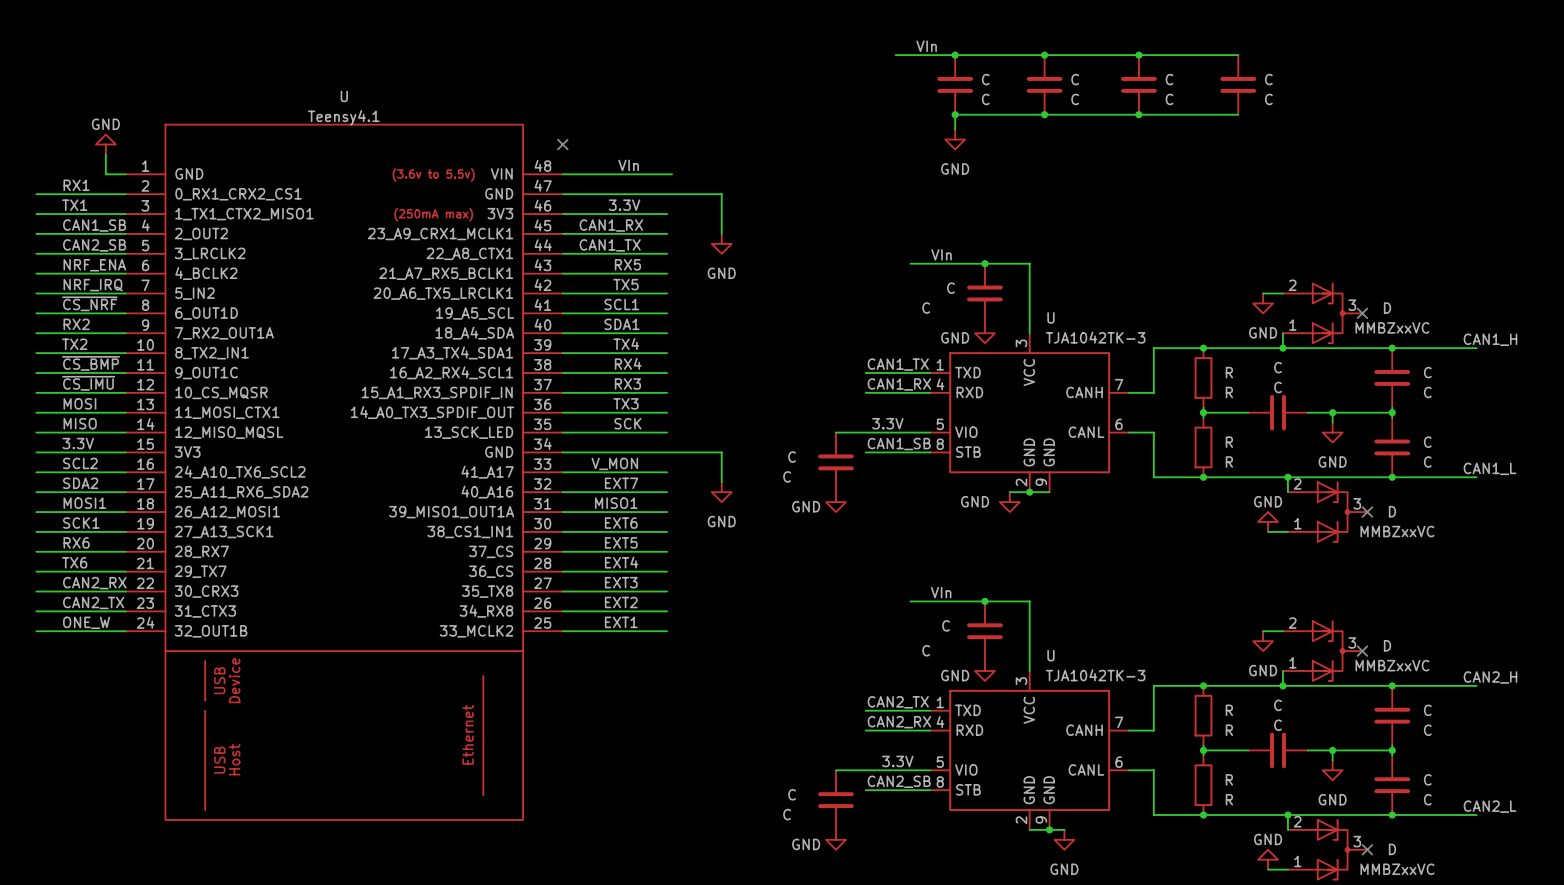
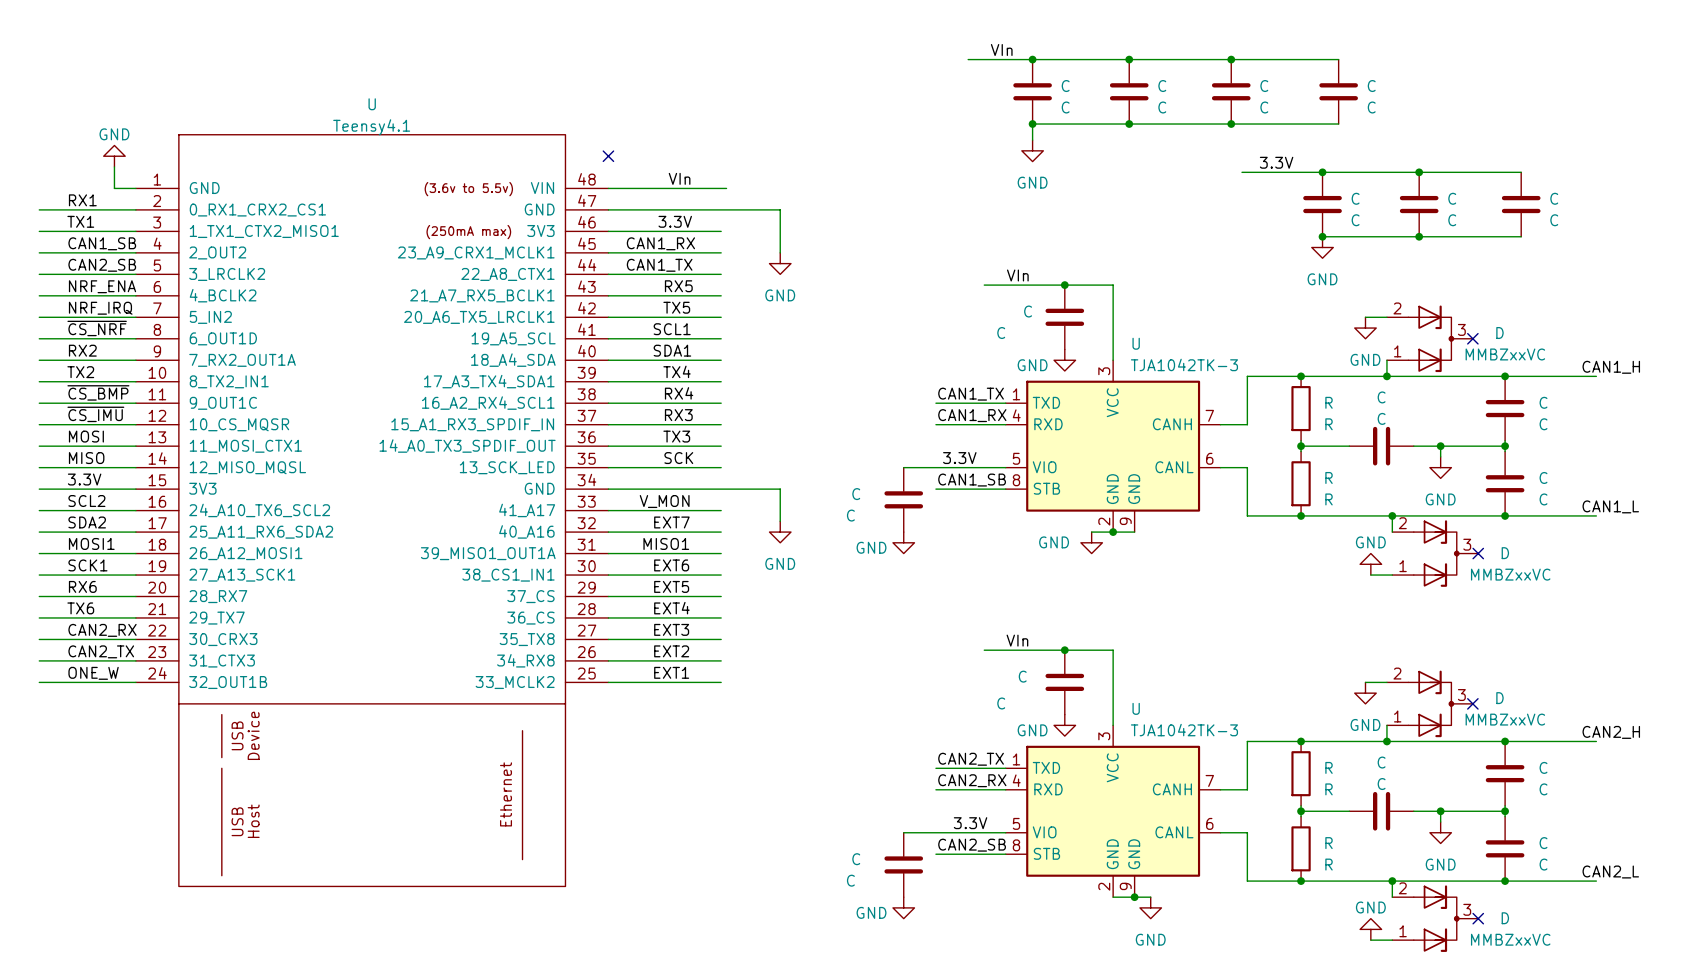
label: none -> 3.3V (1276, 162)
wire: none -> (1241, 172) (1521, 172)
junction: none -> (1322, 172)
junction: none -> (1419, 172)
C: none -> C (1322, 204)
C: none -> C (1419, 204)
C: none -> C (1521, 204)
wire: none -> (1322, 236) (1521, 236)
junction: none -> (1322, 236)
junction: none -> (1419, 236)
power symbol: none -> GND (1322, 247)

